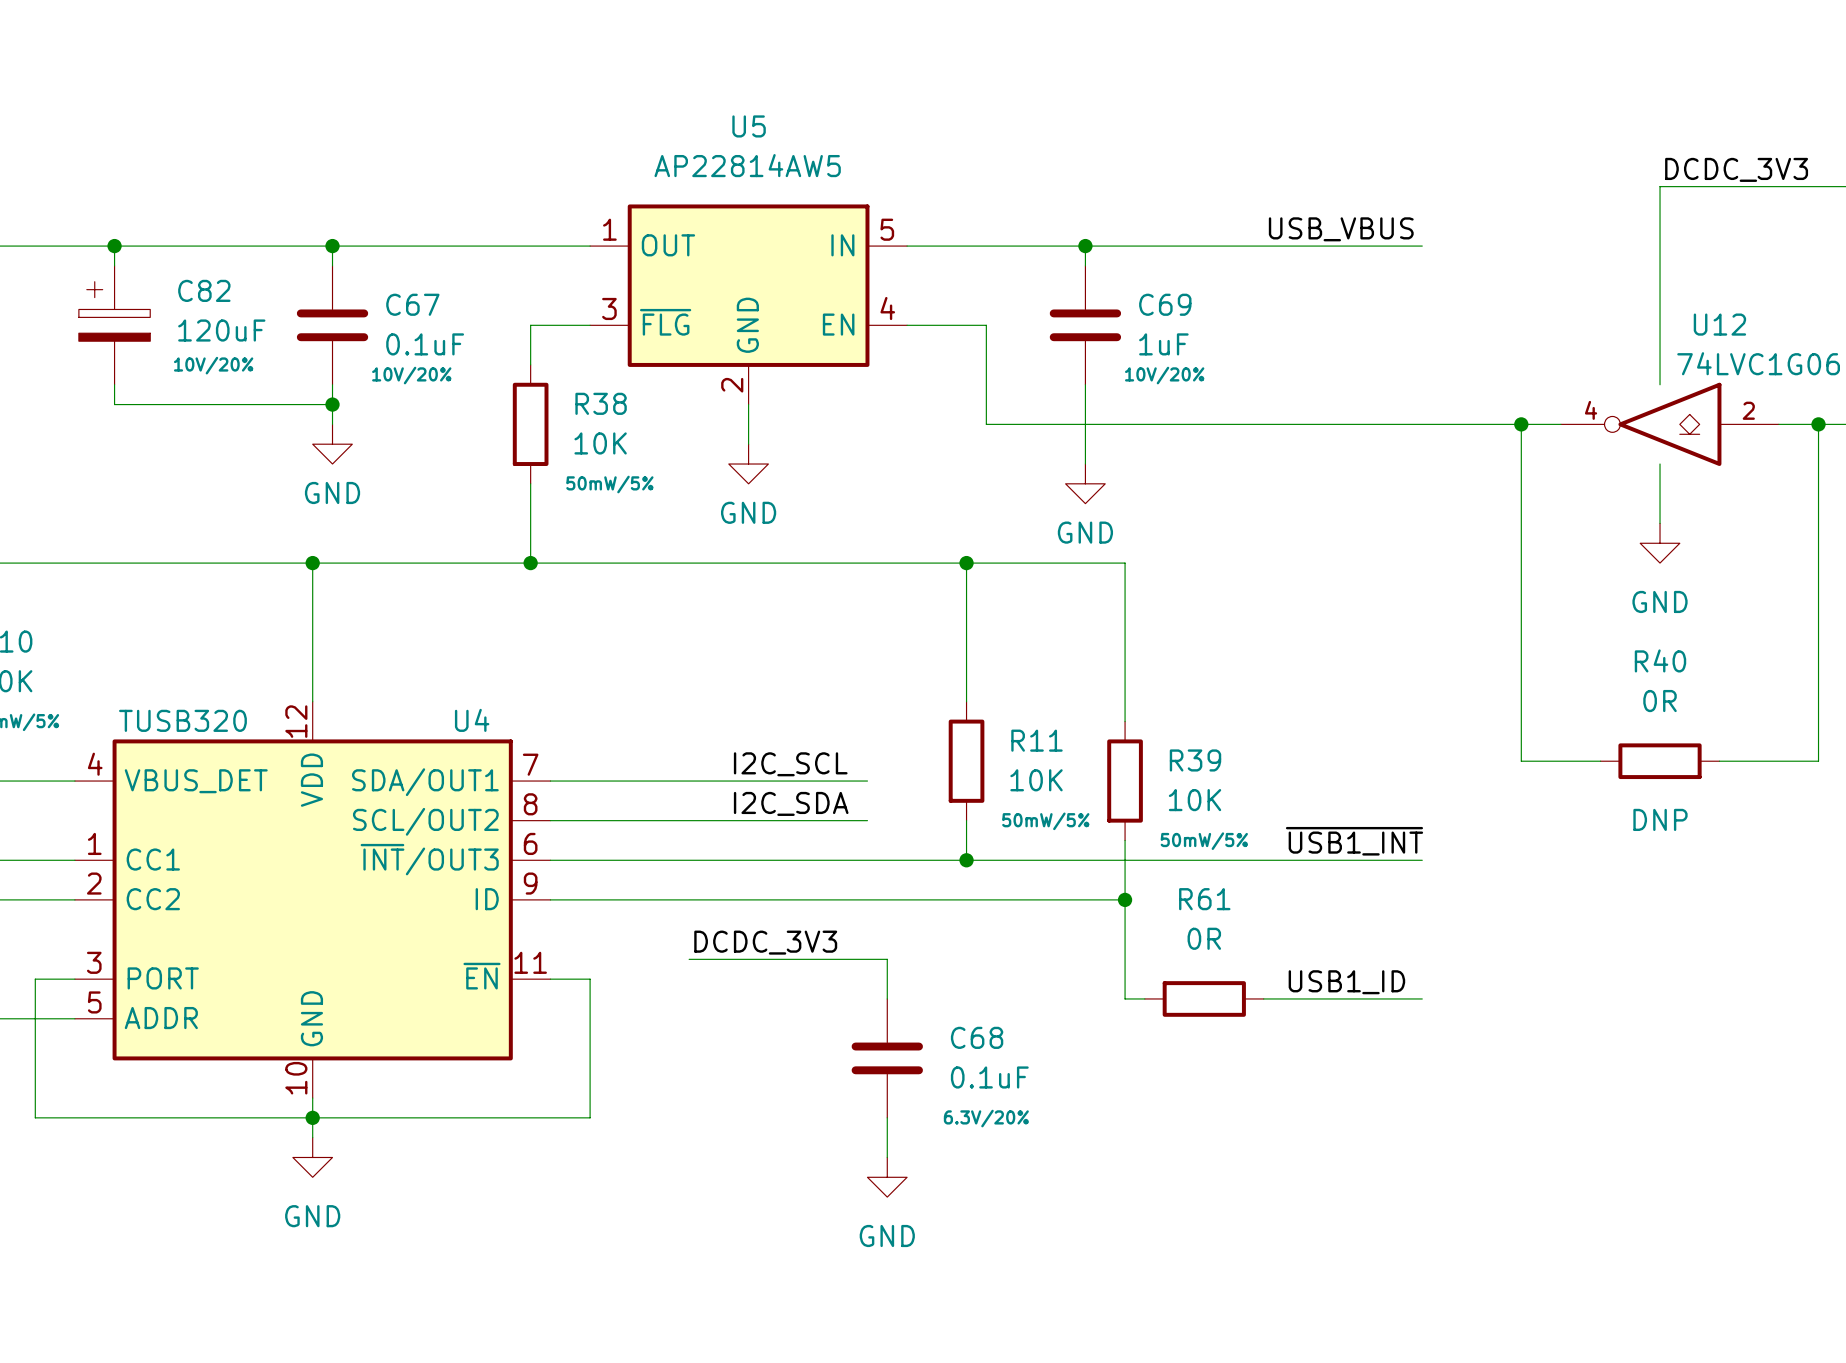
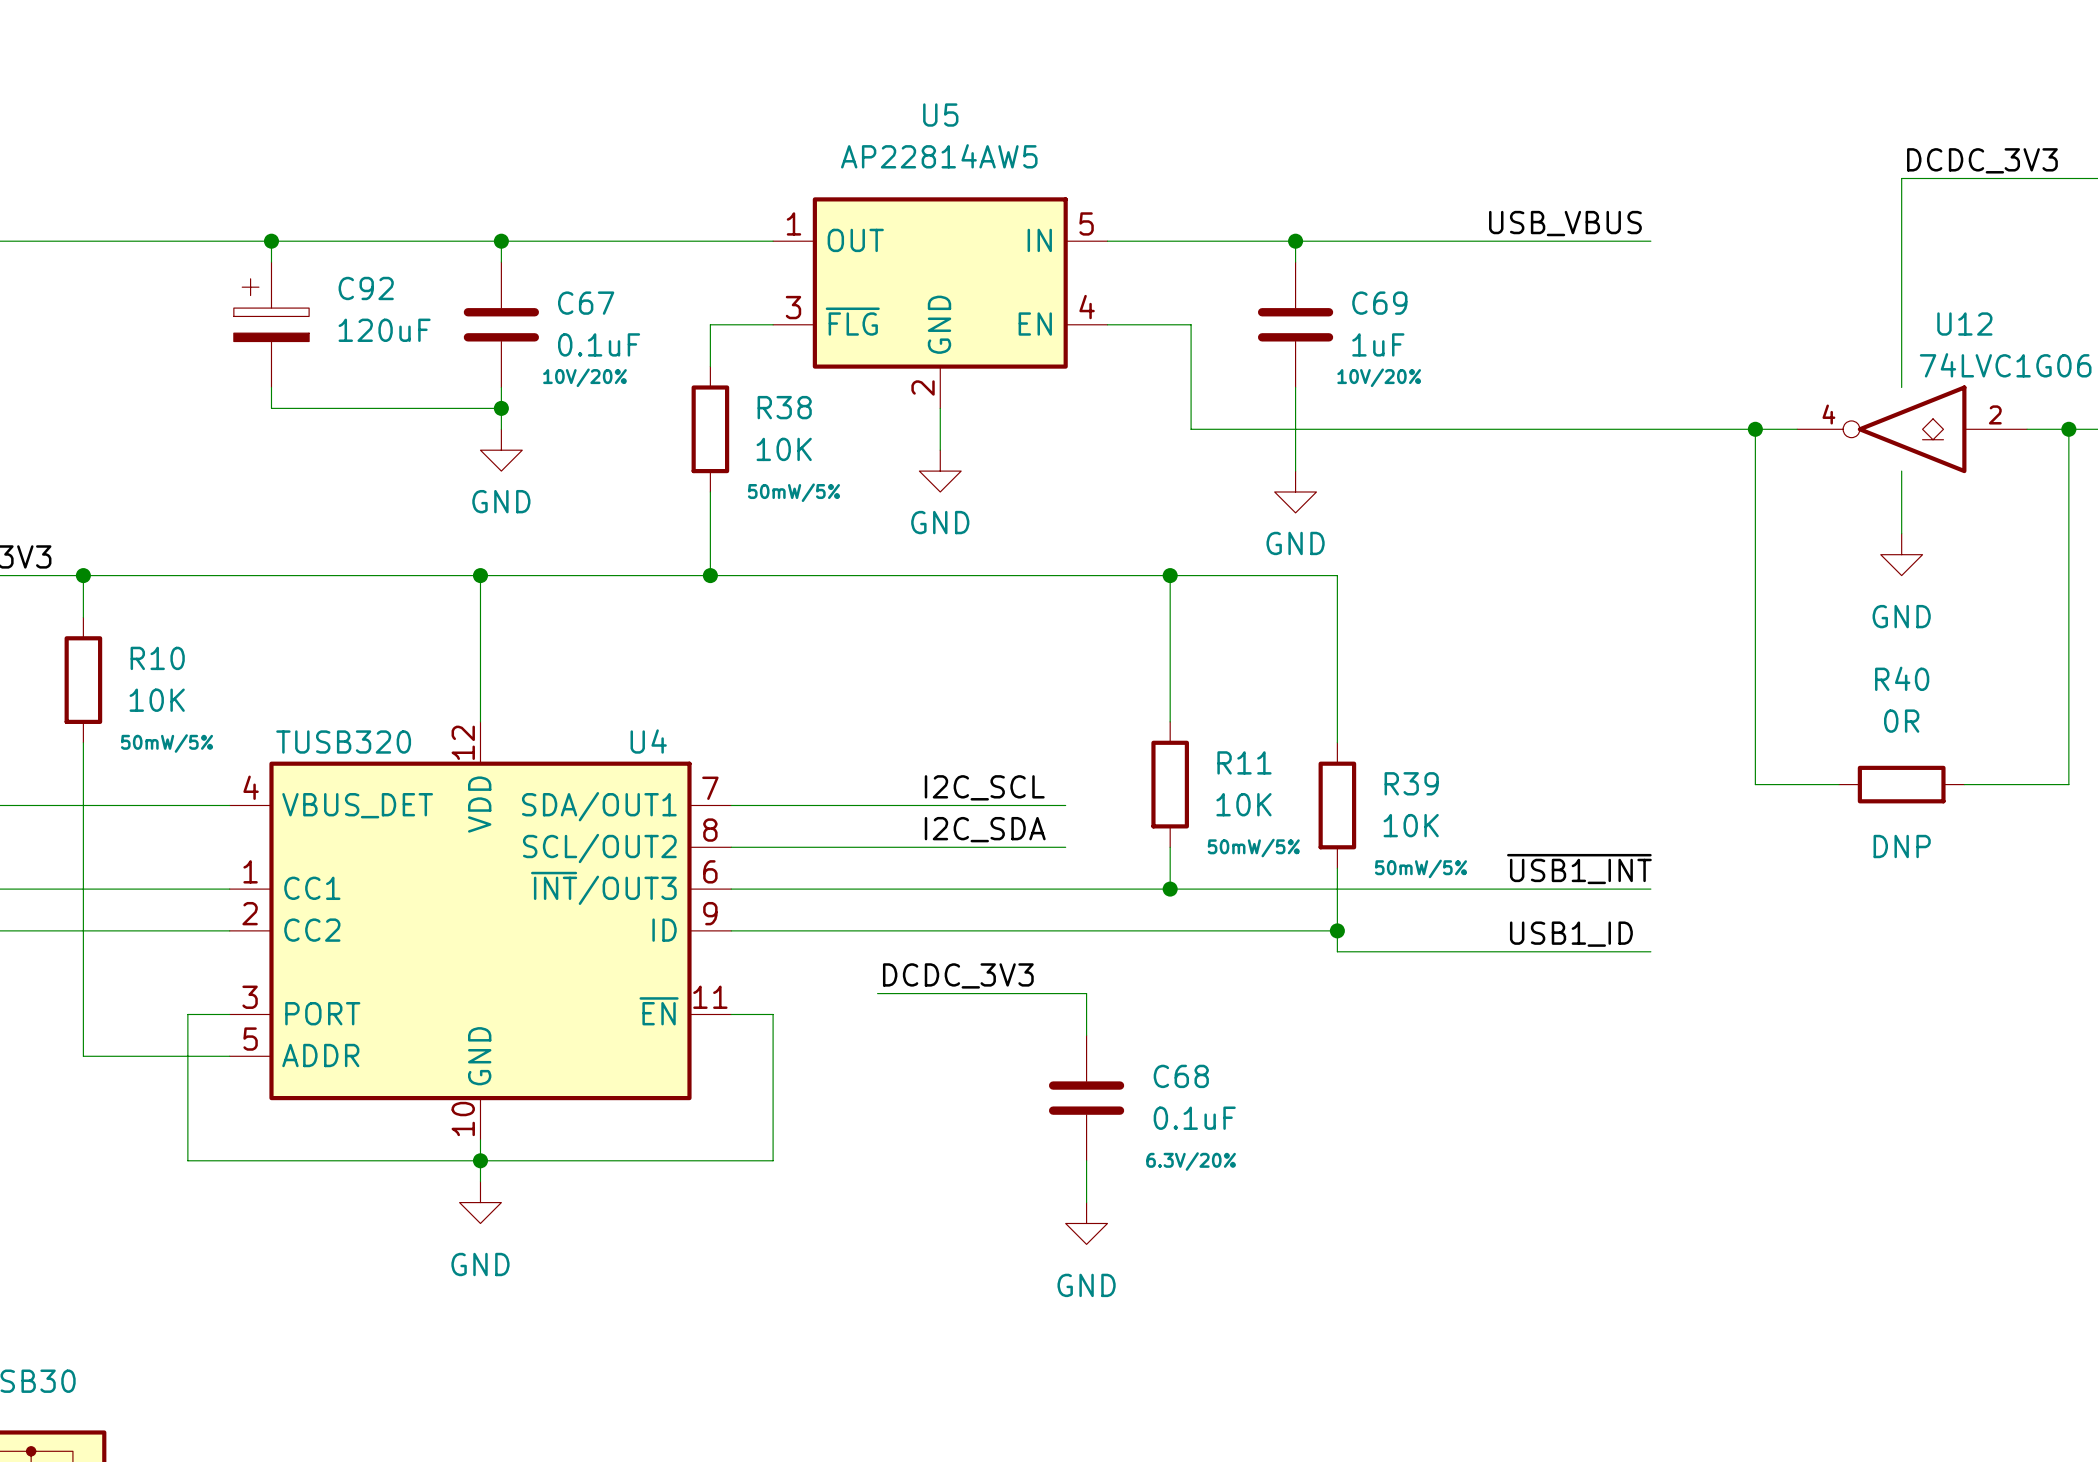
C82 name: C82 (204, 290) -> C92 (366, 288)
C82 text: 10V/20% (213, 365) -> none
wire: (1125, 919) (1125, 998) (1144, 998) -> (1337, 951) (1650, 951)
label position: USB1_ID (1346, 982) -> USB1_ID (1571, 934)
R61: 0R (1204, 998) -> none
wire: (1263, 998) (1422, 998) -> none

